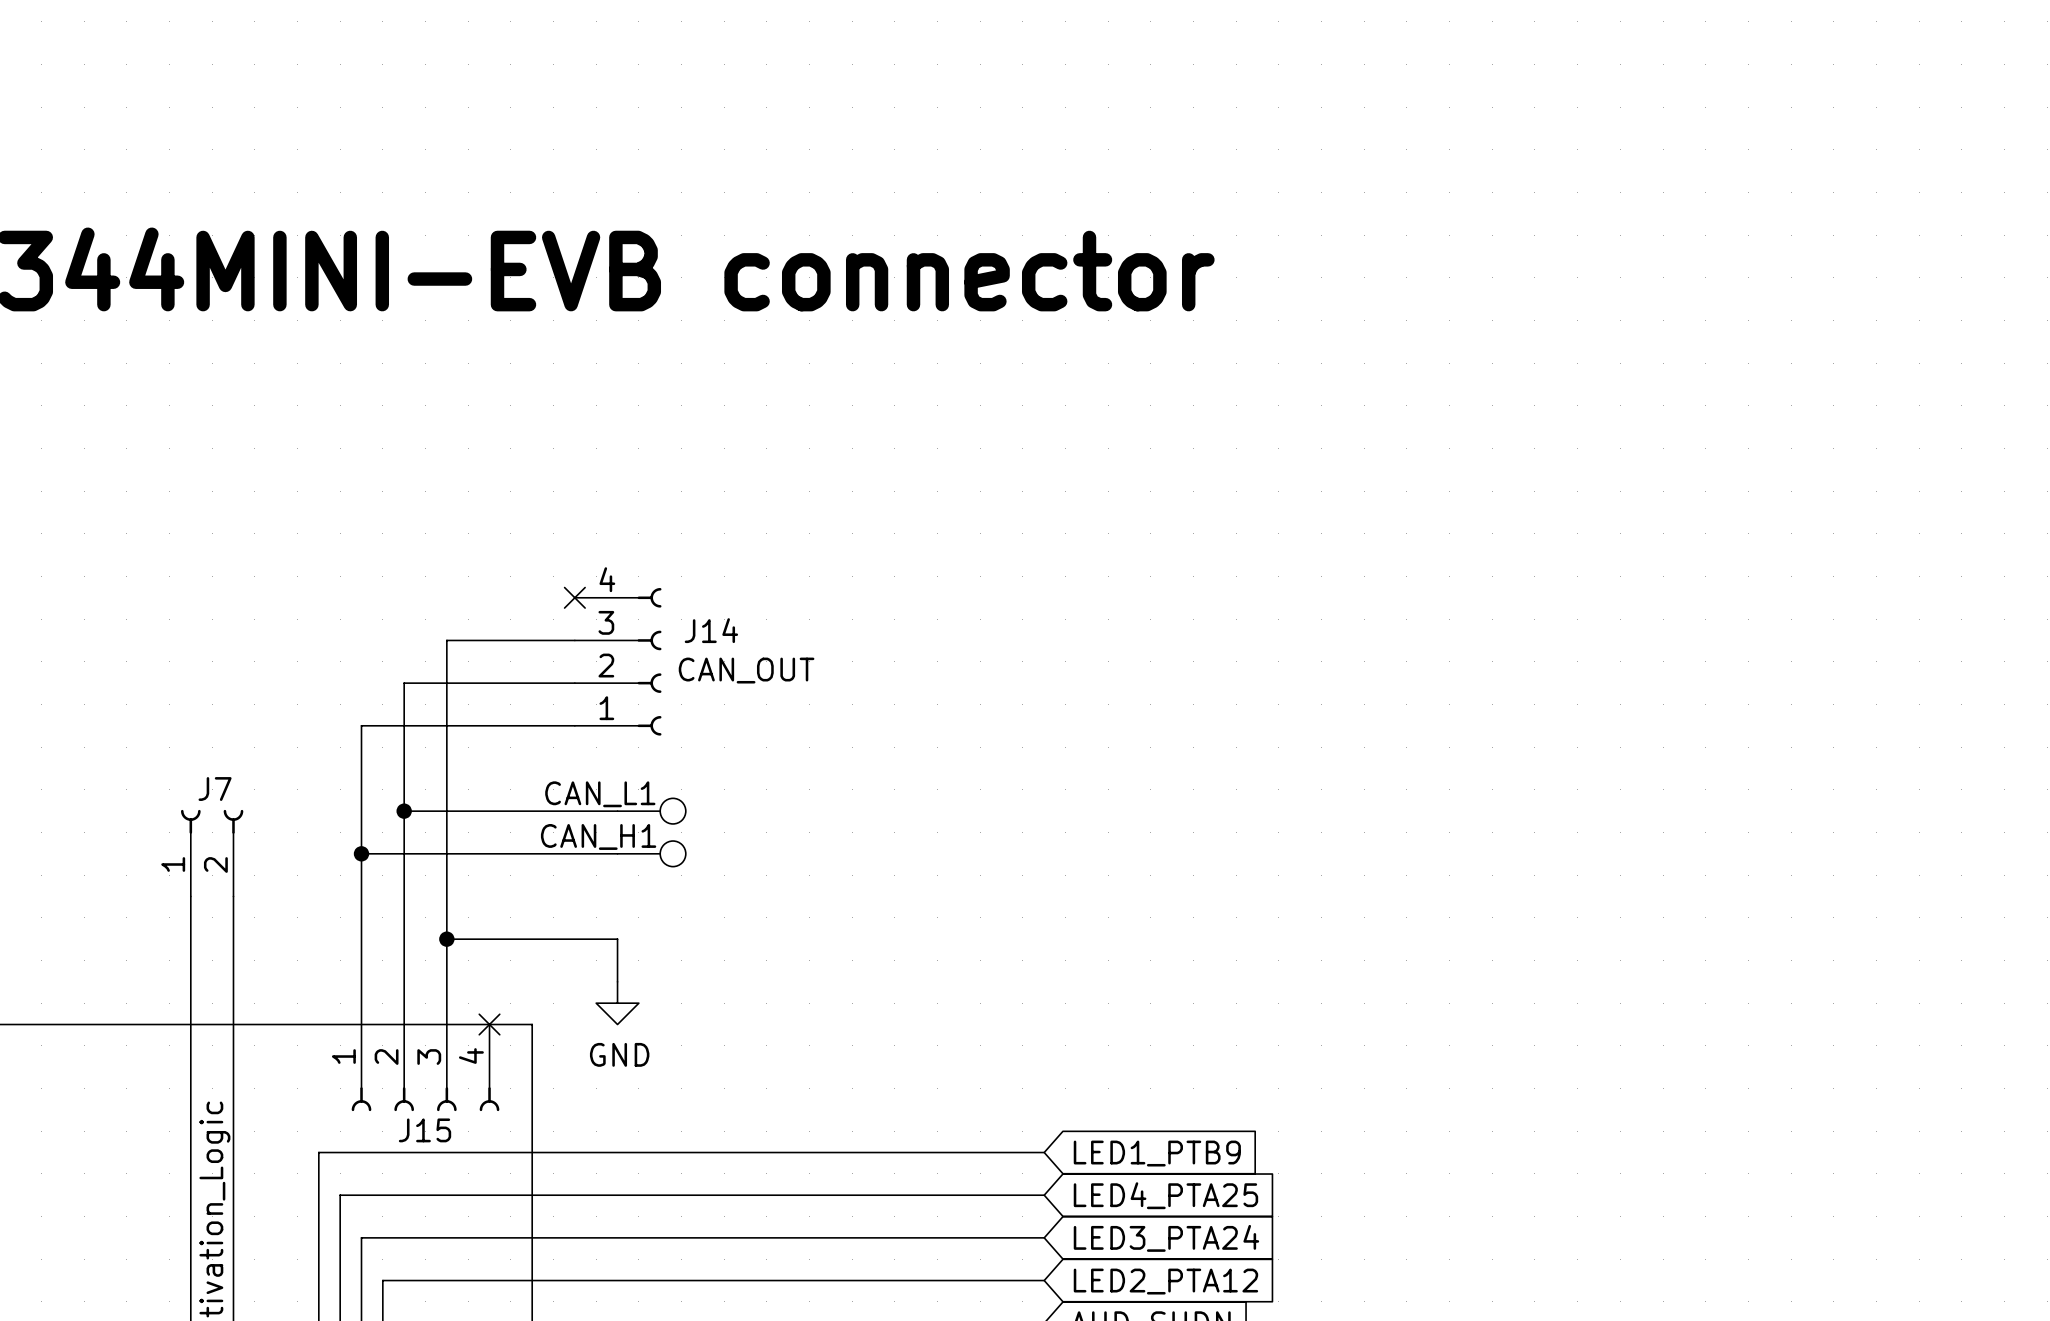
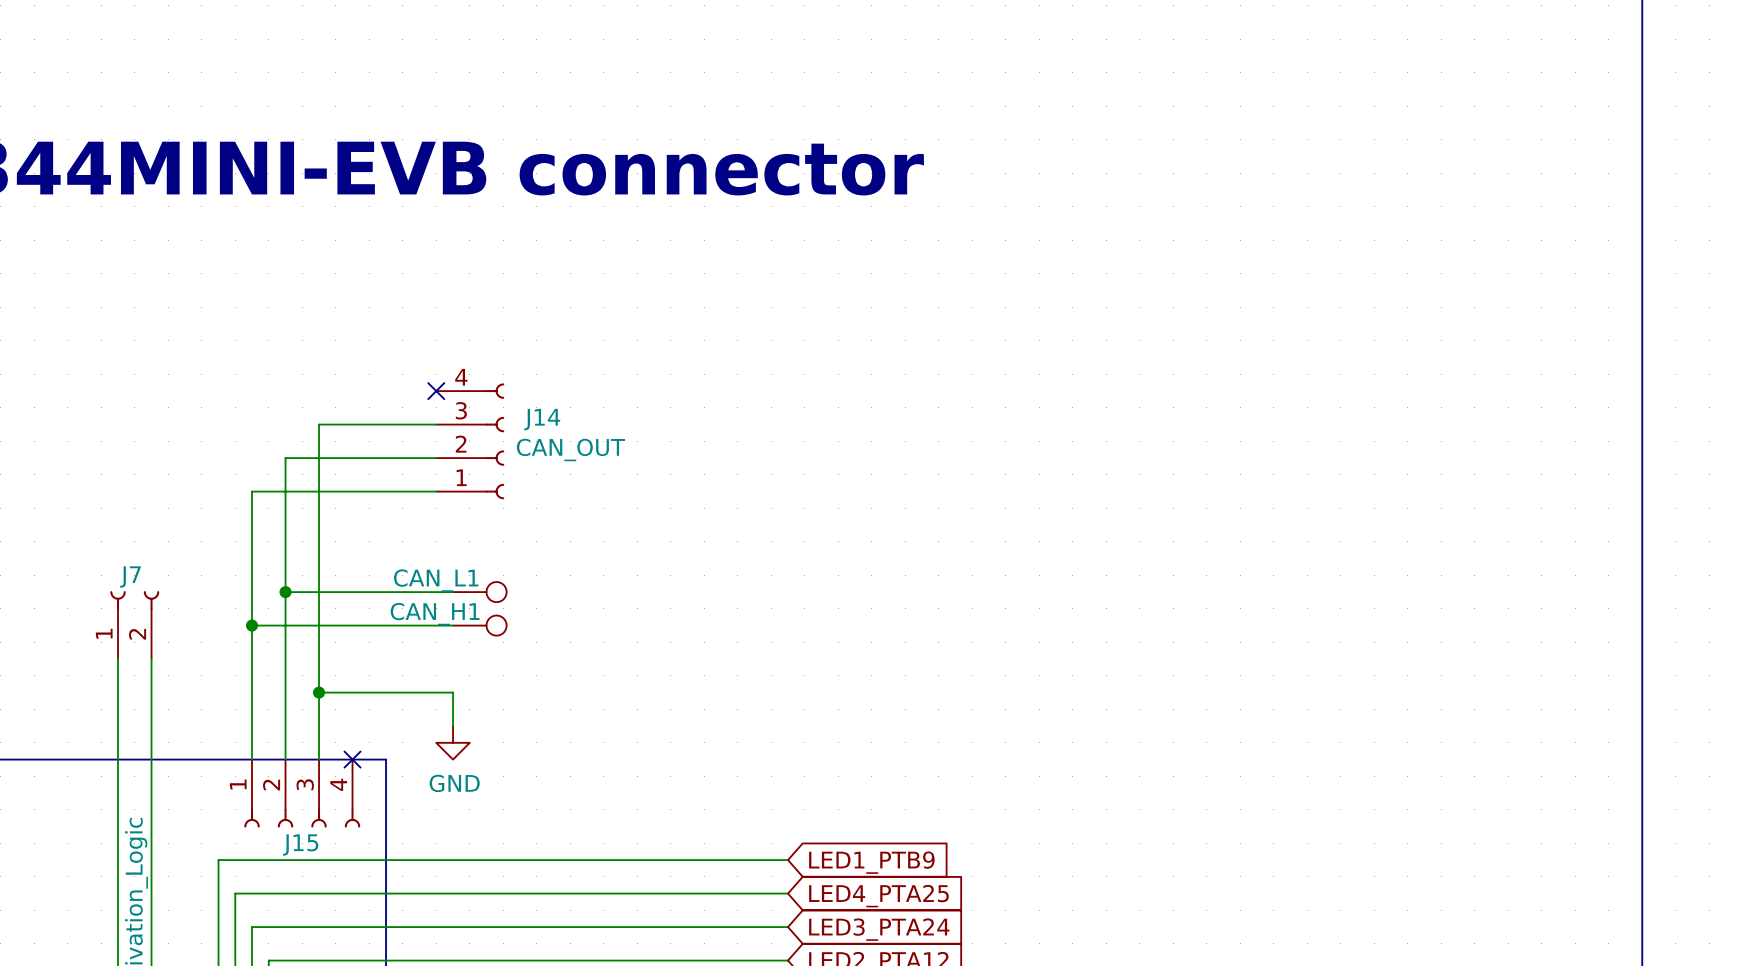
no-connect mark position: (574, 597) -> (436, 391)
J14 position: (618, 661) -> (470, 441)
wire: (361, 725) (574, 725) -> (252, 525) (252, 491) (285, 491) (285, 458) (319, 458) (319, 424) (436, 424)

